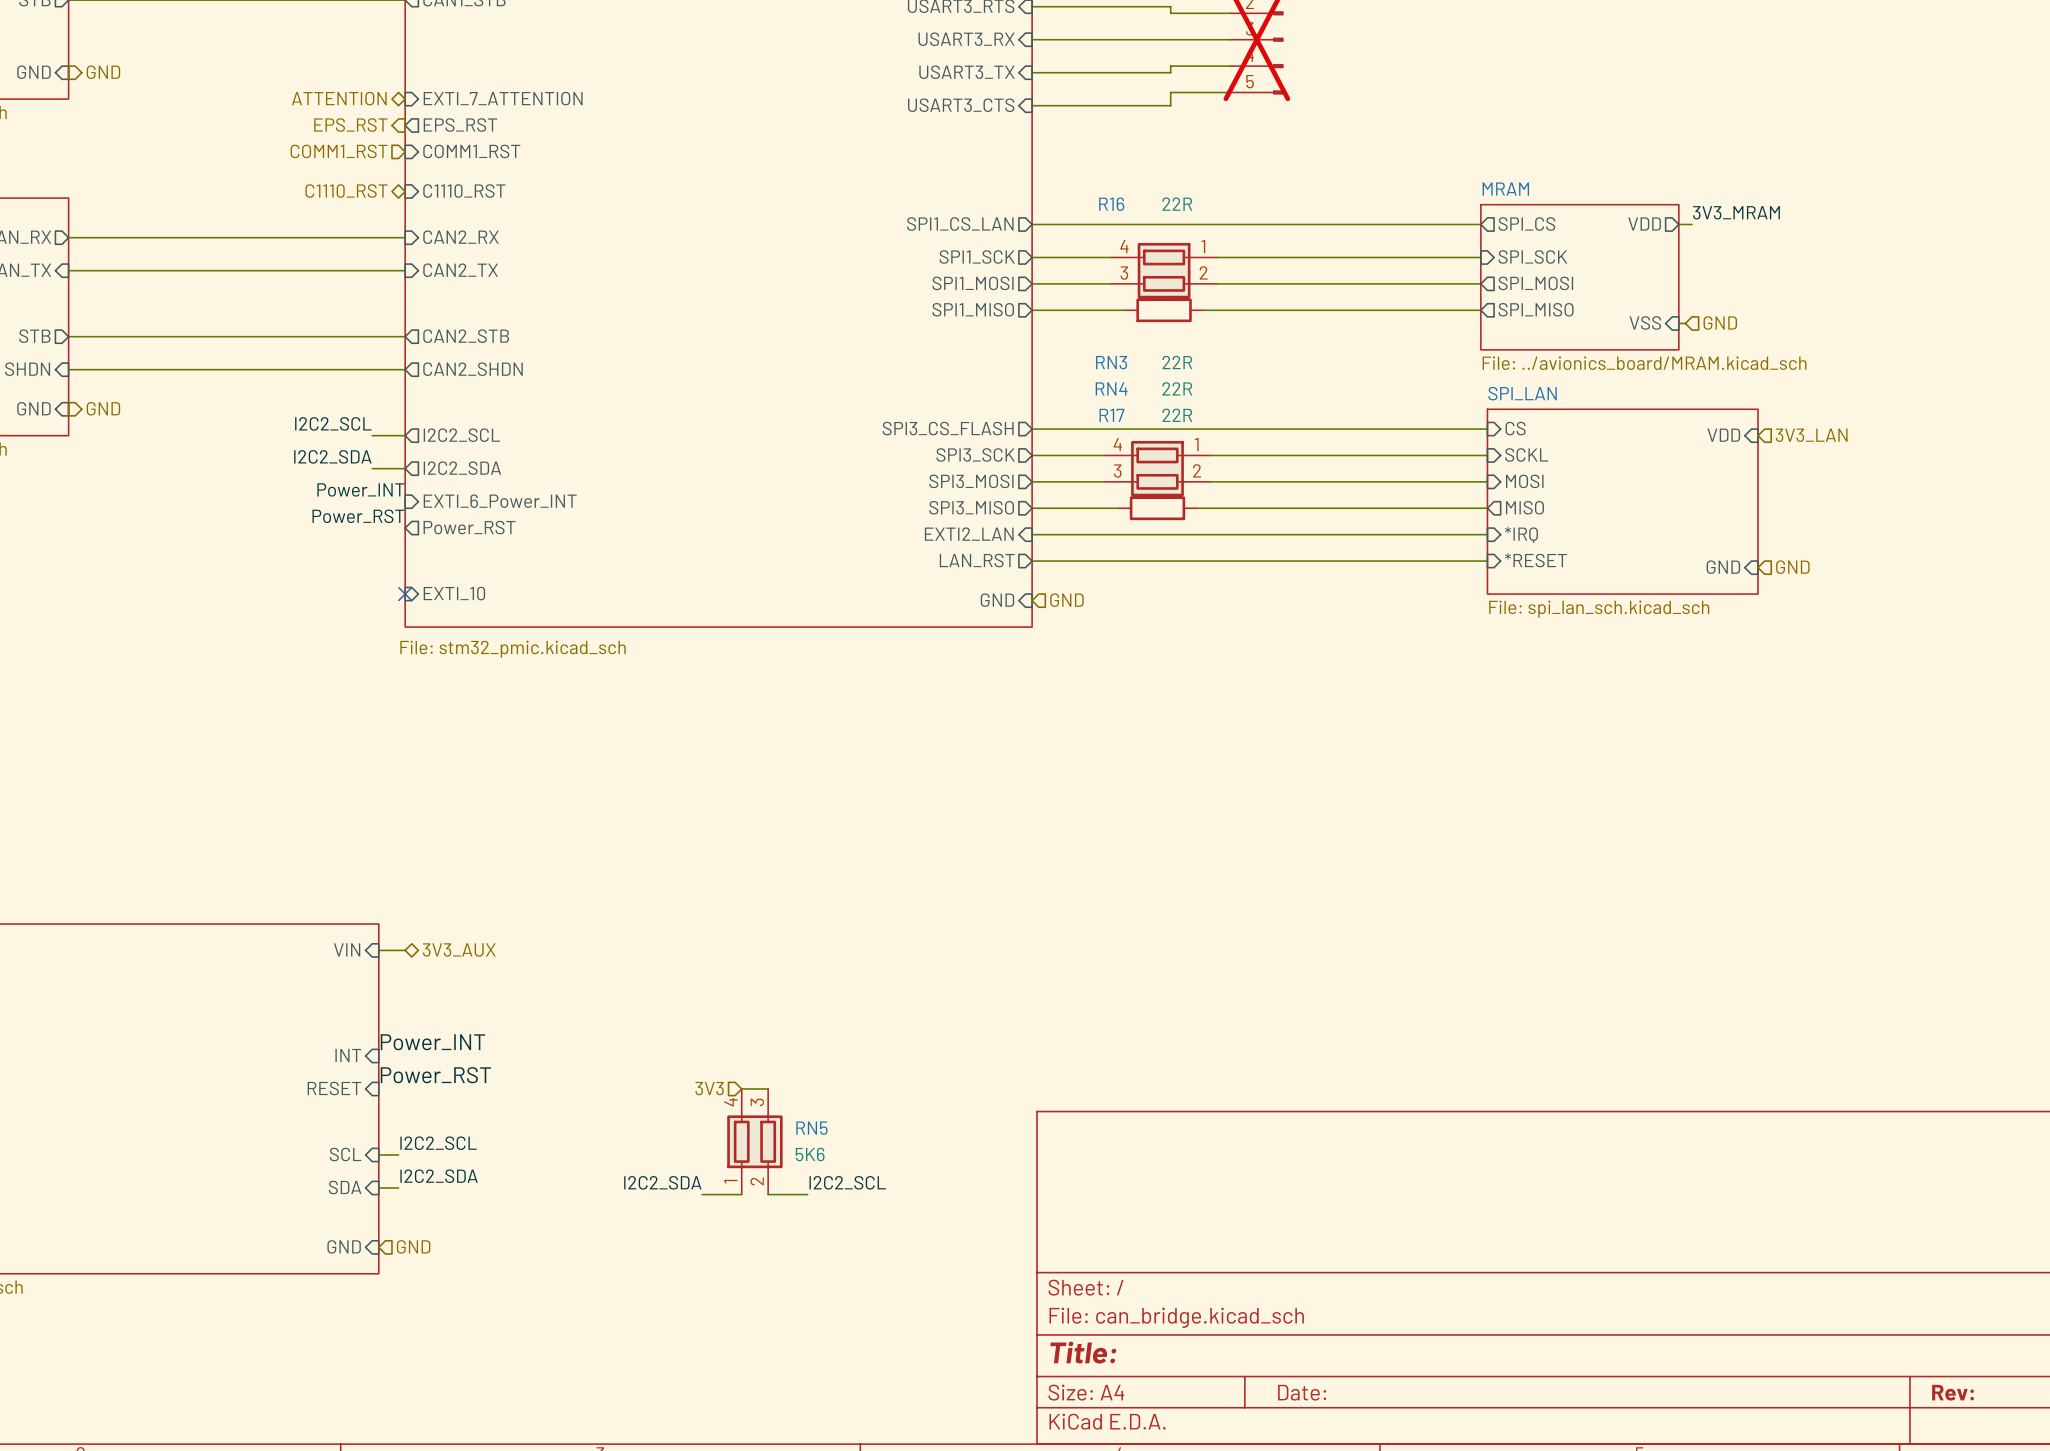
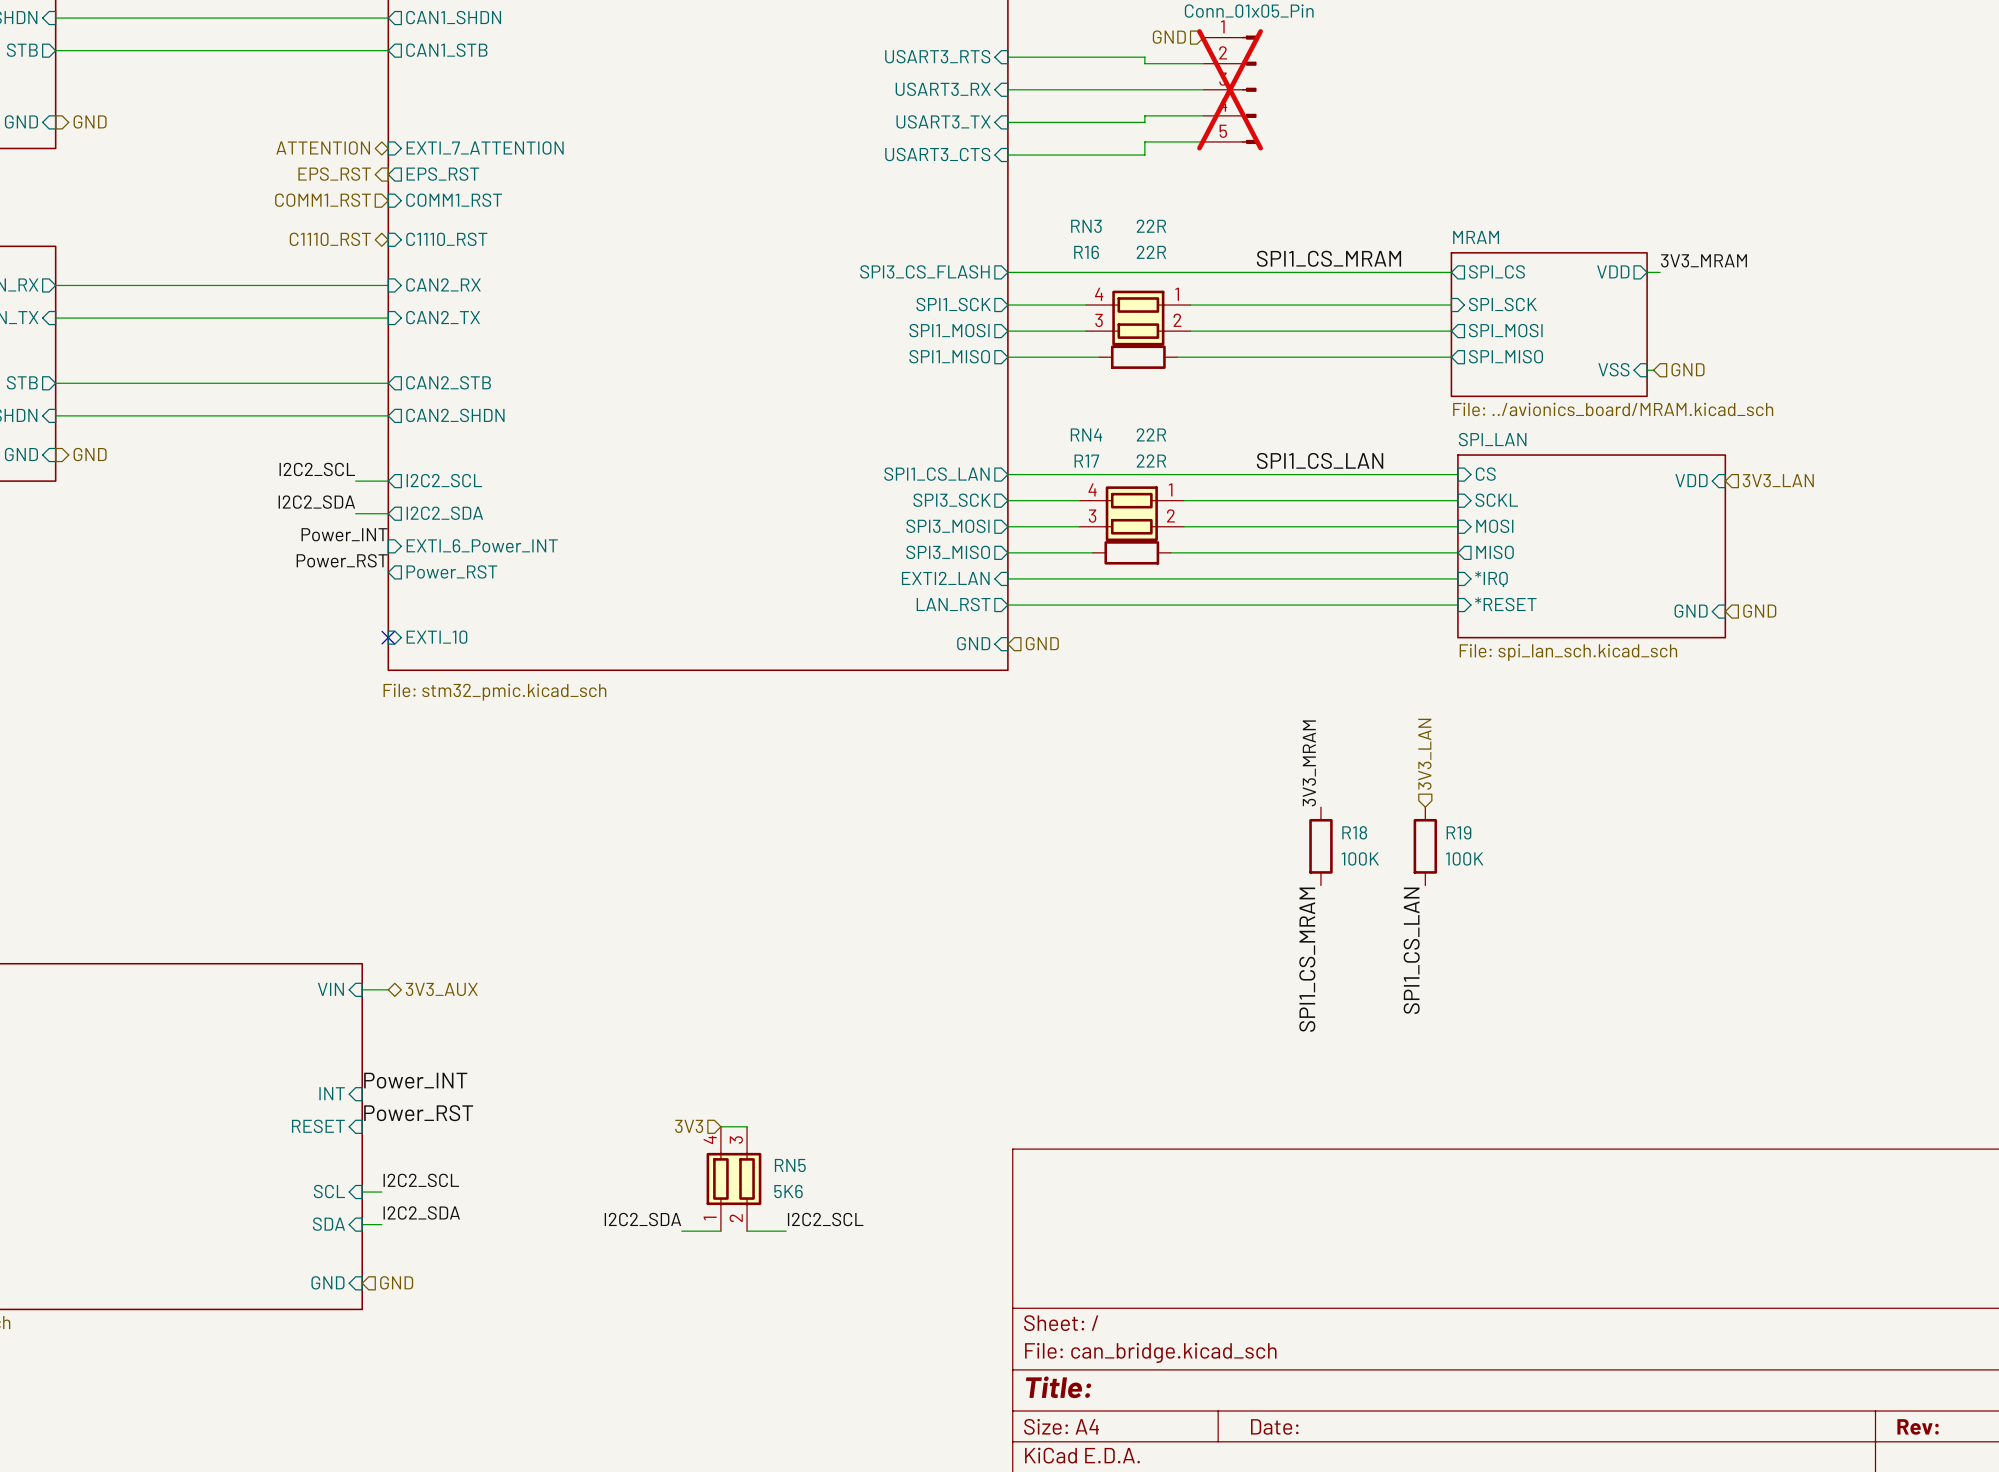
label: none -> SPI1_CS_MRAM (1329, 258)
sheet pin: SPI1_CS_LAN (960, 224) -> SPI3_CS_FLASH (924, 271)
RN3 name position: RN3 (1111, 362) -> RN3 (1086, 226)
RN3 value position: 22R (1177, 362) -> 22R (1151, 226)
label: none -> SPI1_CS_LAN (1320, 460)
sheet pin: SPI3_CS_FLASH (948, 428) -> SPI1_CS_LAN (936, 474)
hierarchical label: none -> 3V3_LAN (1424, 754)
label: none -> 3V3_MRAM (1309, 763)
R18: none -> 100K (1320, 846)
R19: none -> 100K (1425, 846)
label: none -> SPI1_CS_LAN (1411, 950)
label: none -> SPI1_CS_MRAM (1307, 959)

